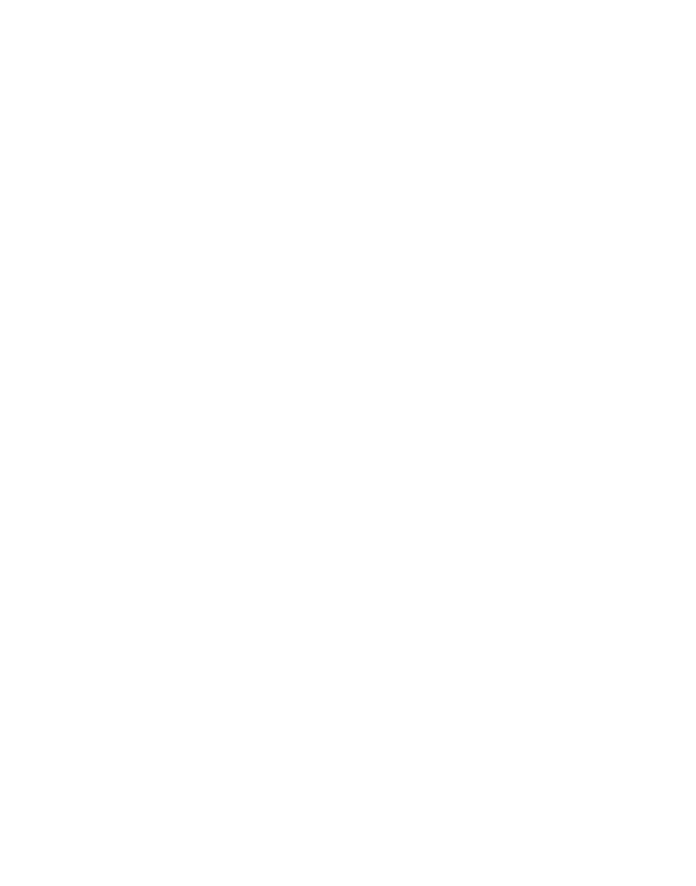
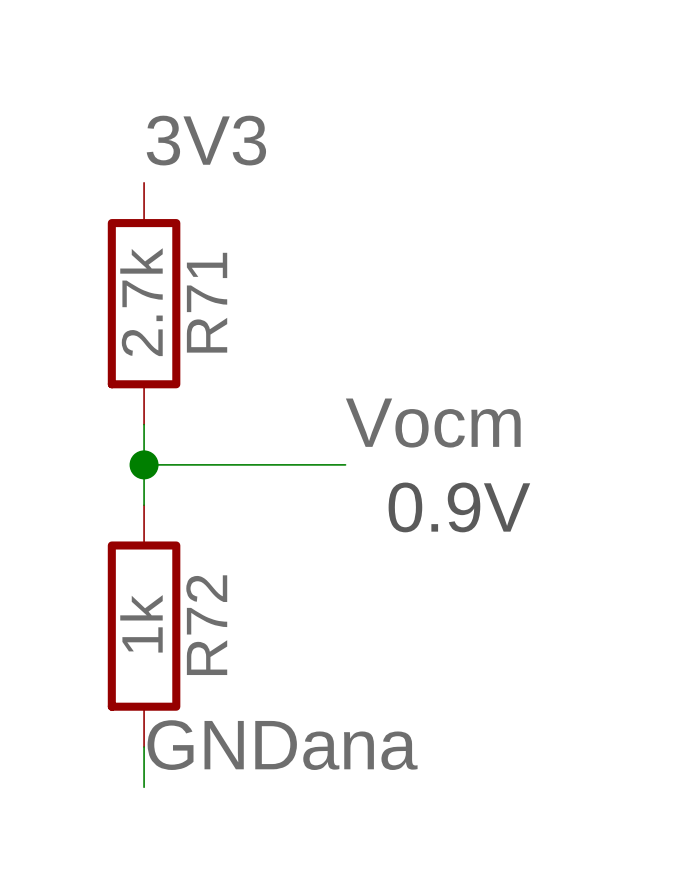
label: none -> 3V3 (206, 140)
R71: none -> 2.7k (144, 303)
label: none -> Vocm (433, 423)
wire: none -> (144, 424) (144, 505)
wire: none -> (144, 464) (345, 464)
junction: none -> (144, 464)
text: none -> 0.9V (459, 507)
R72: none -> 1k (144, 626)
label: none -> GNDana (282, 745)
wire: none -> (144, 747) (144, 787)

